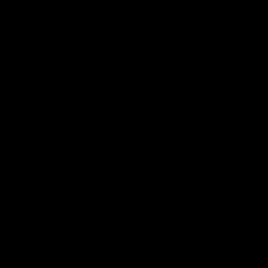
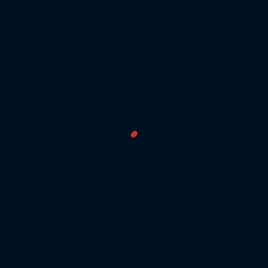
top track: none -> (134, 133) (133, 134)

